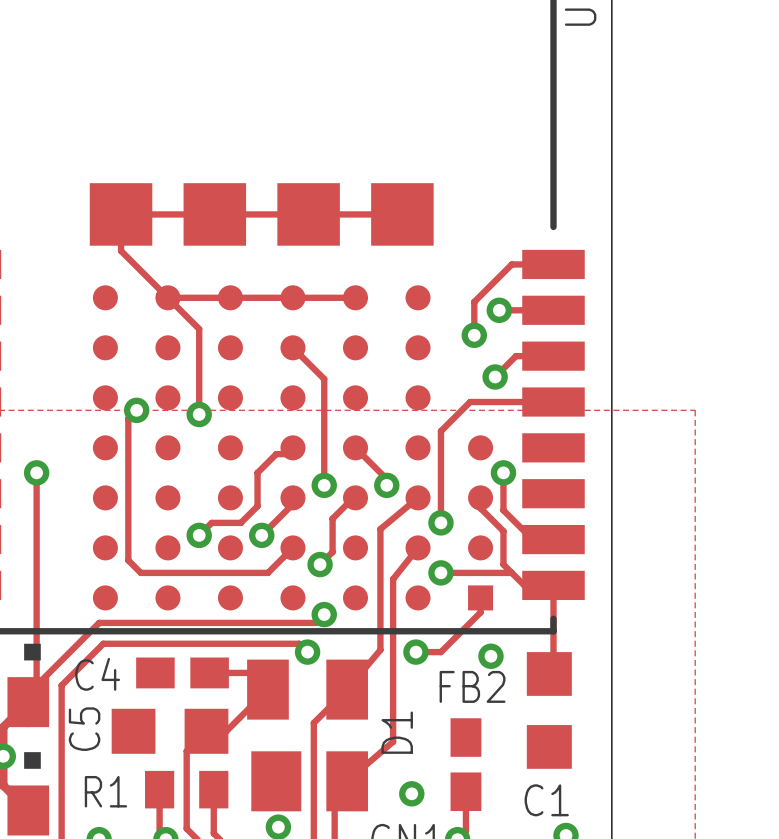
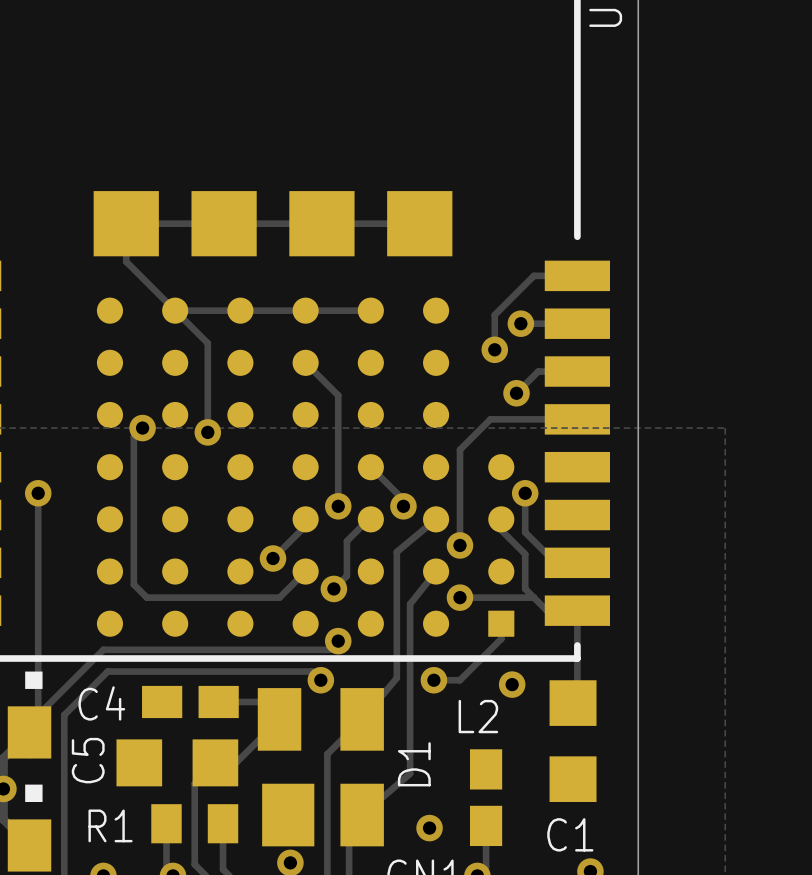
track: (292, 447) (292, 454) (276, 454) (257, 472) (257, 506) (240, 522) (211, 522) (199, 535) -> none
via: (199, 535) -> none
FB2 name: FB2 (472, 686) -> L2 (478, 716)

